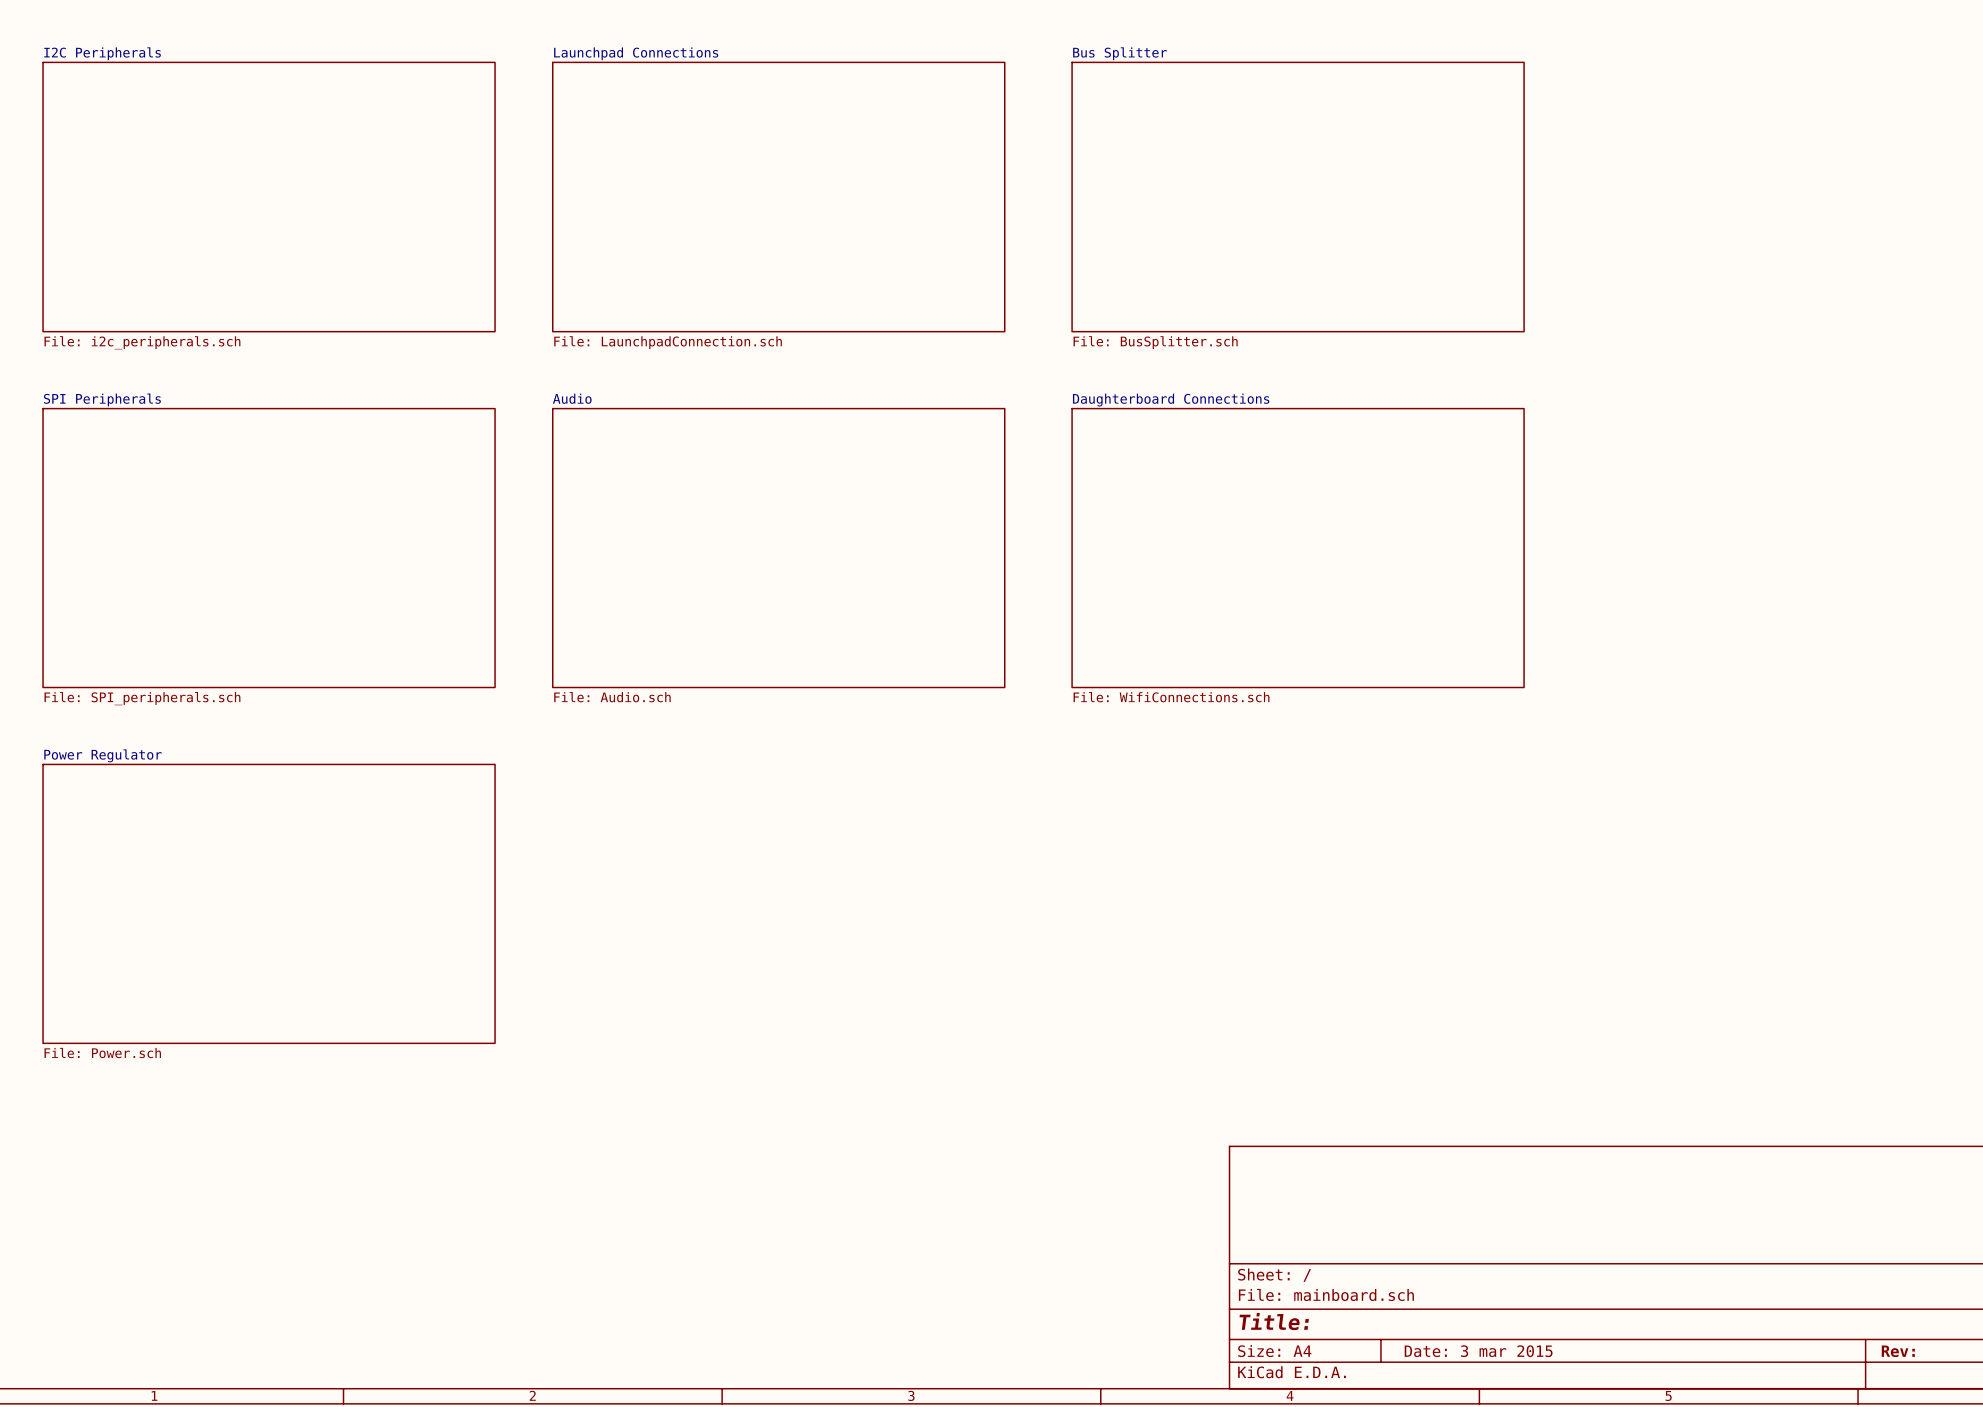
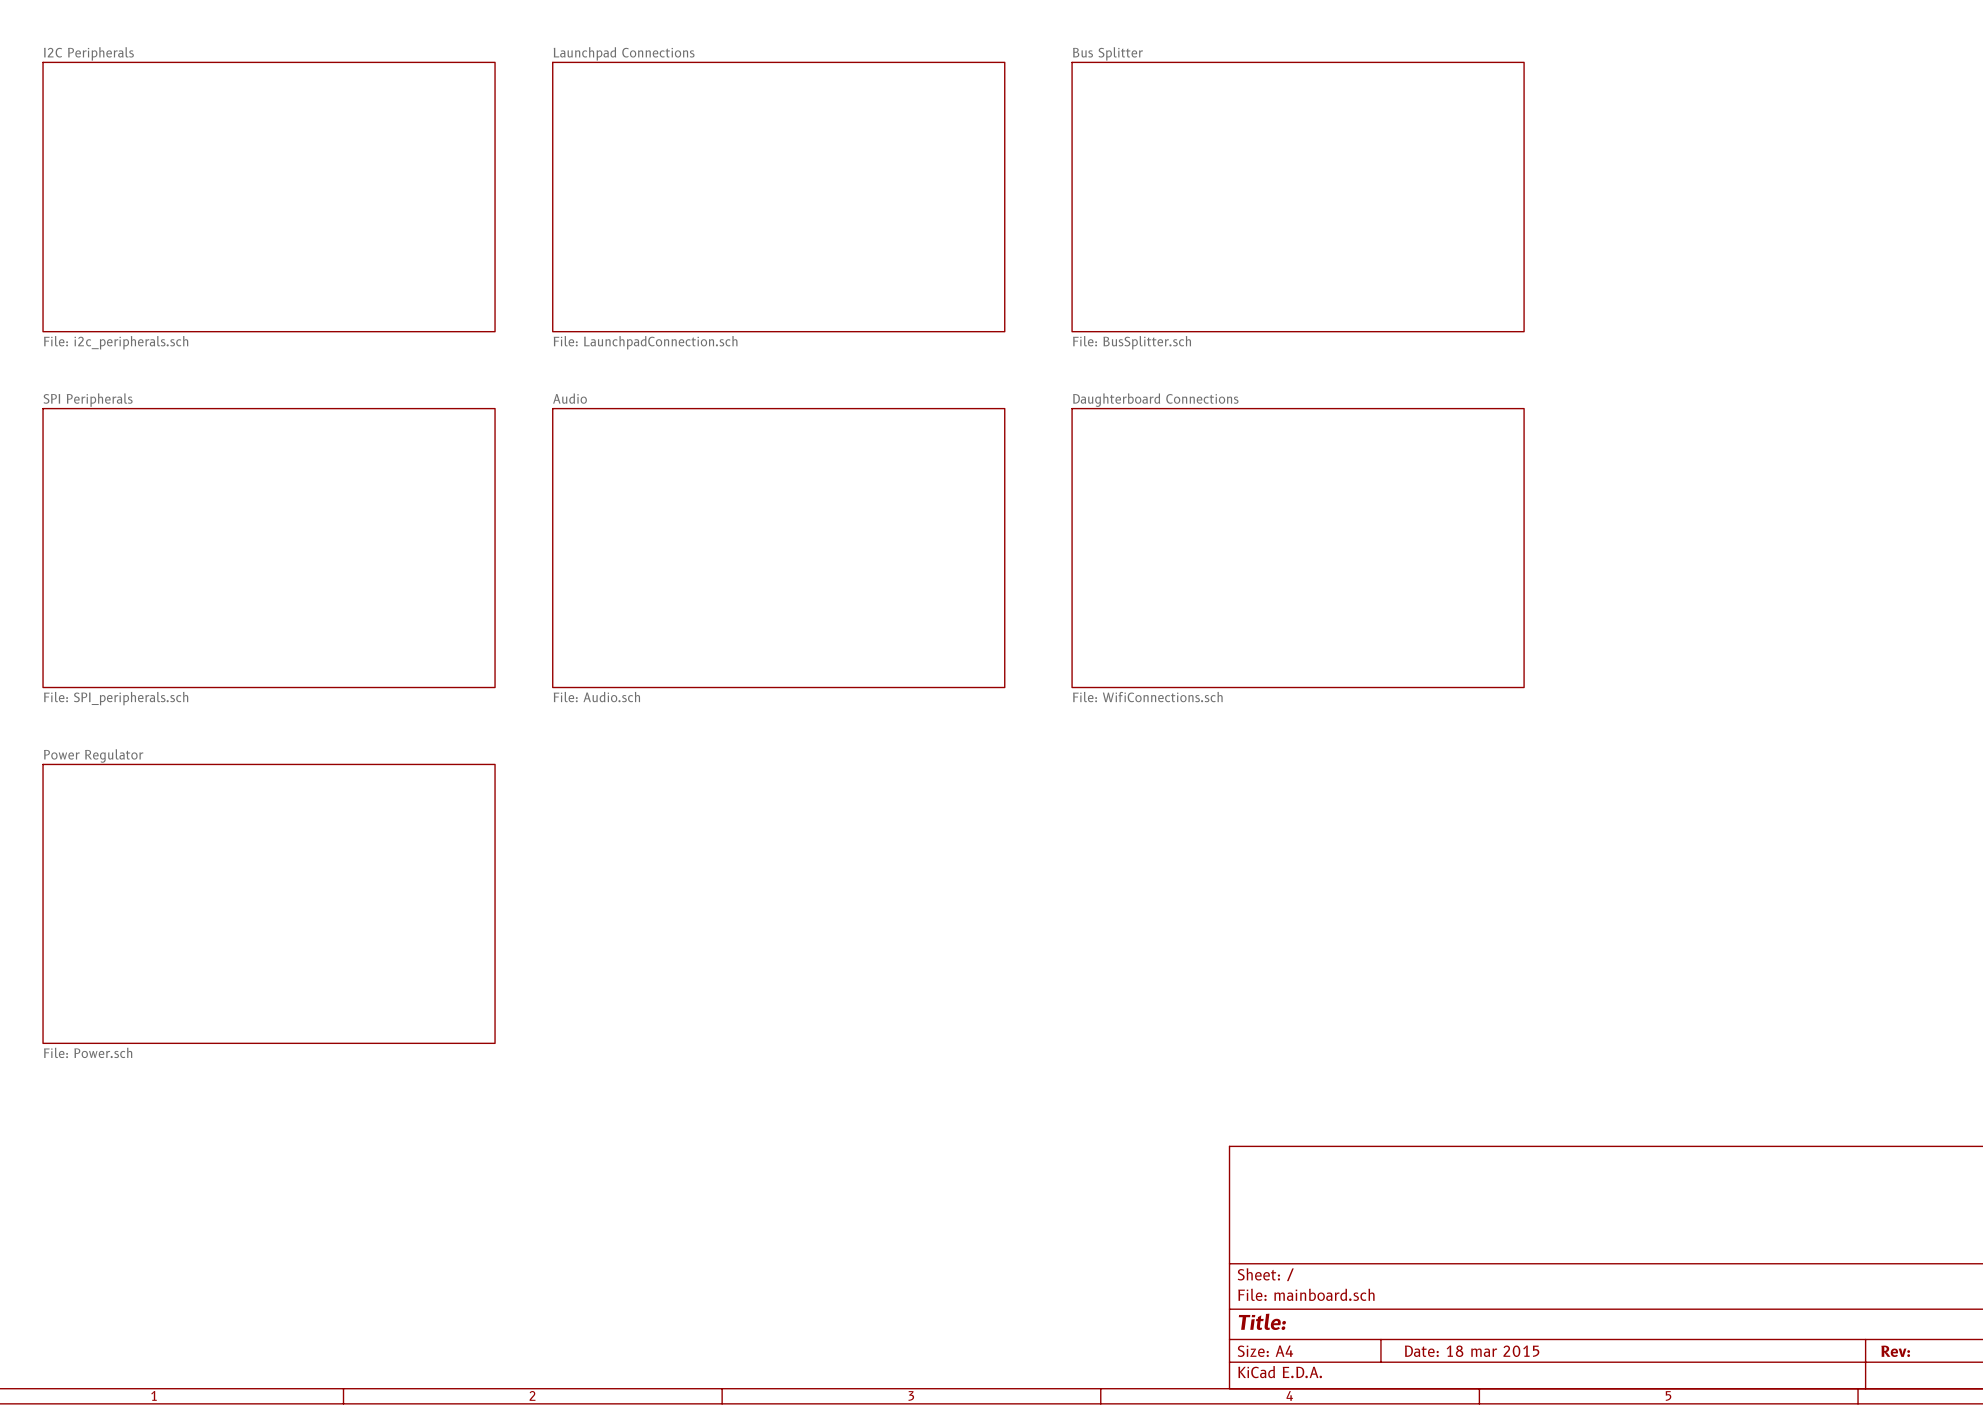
title block: Date: 3 mar 2015 (1478, 1351) -> Date: 18 mar 2015 (1472, 1351)

